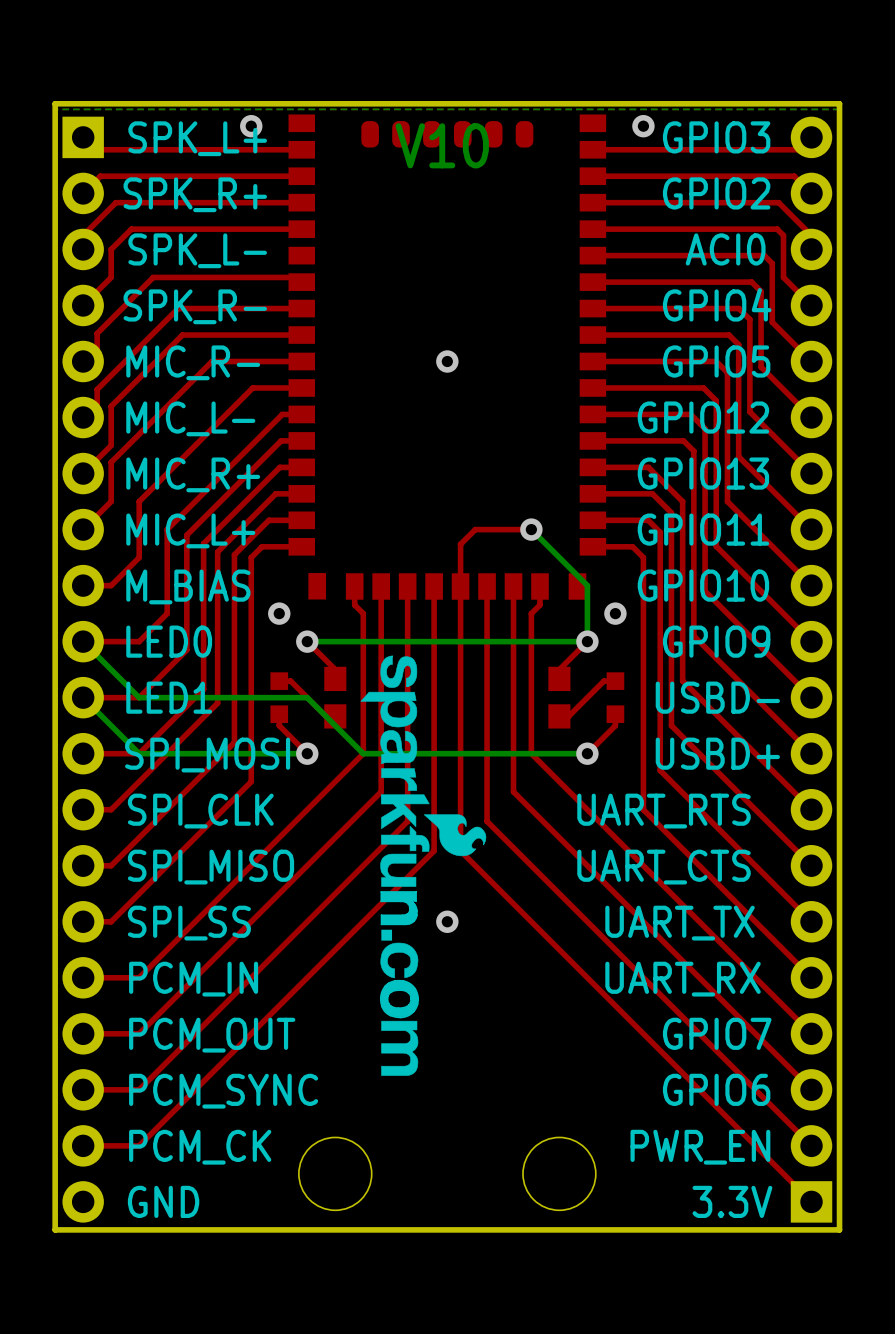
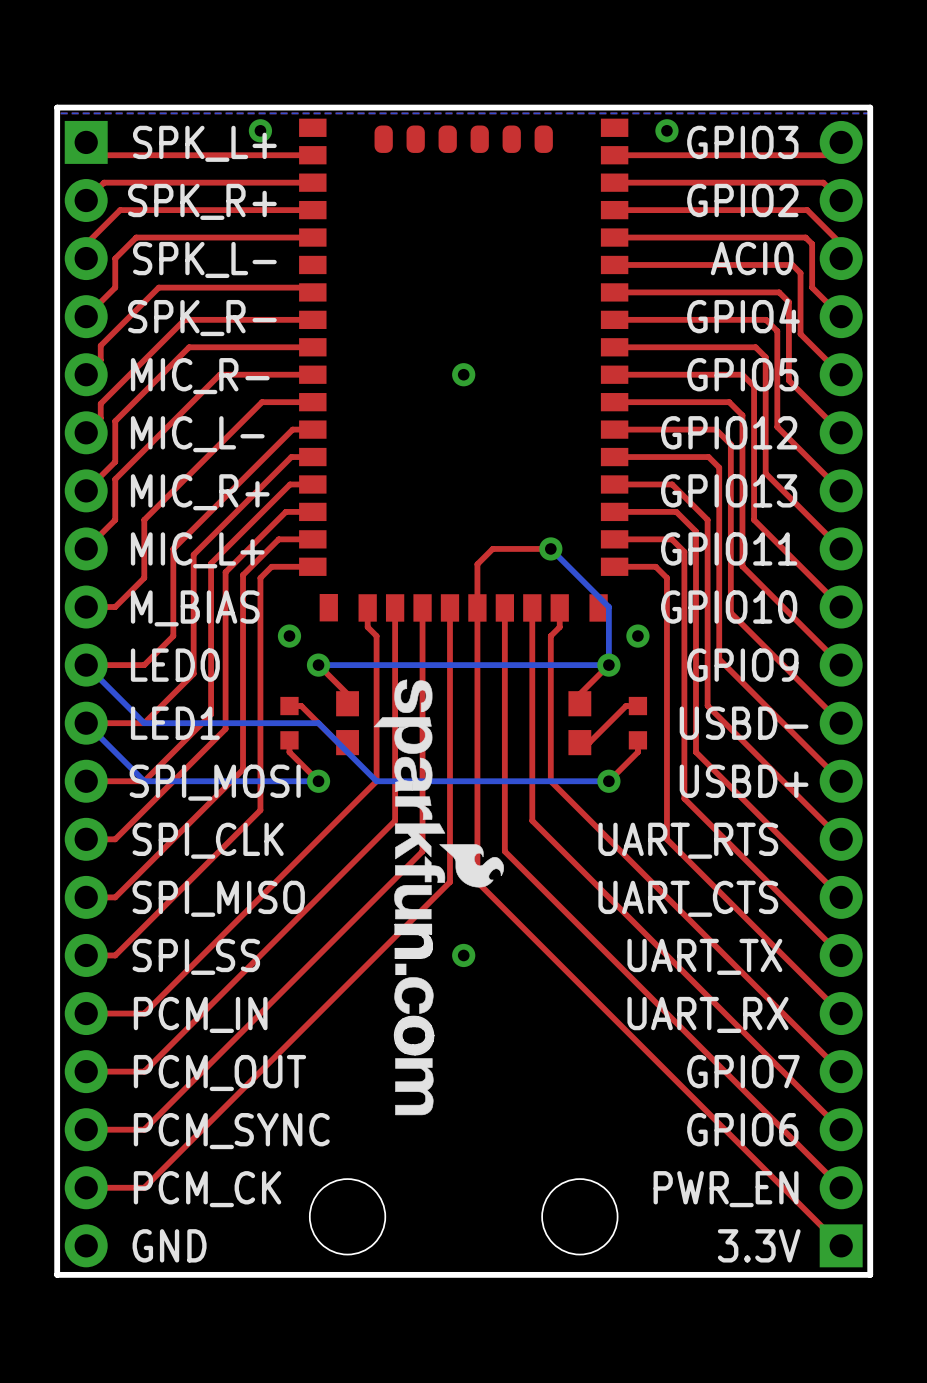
text: V10 (442, 145) -> none

